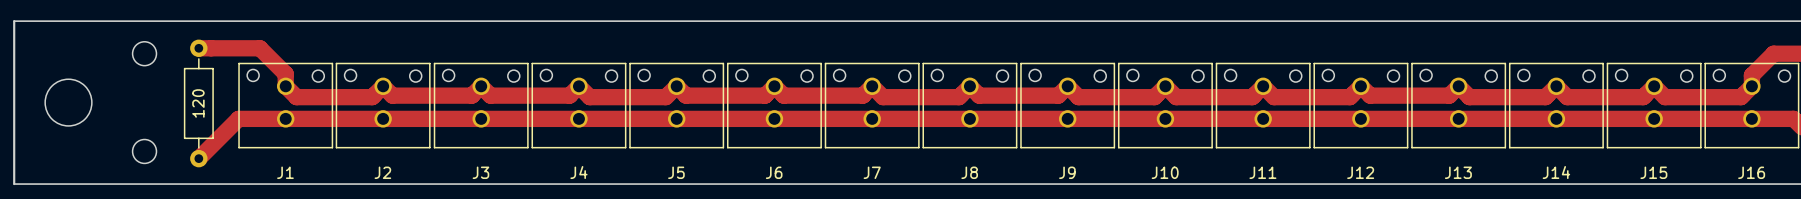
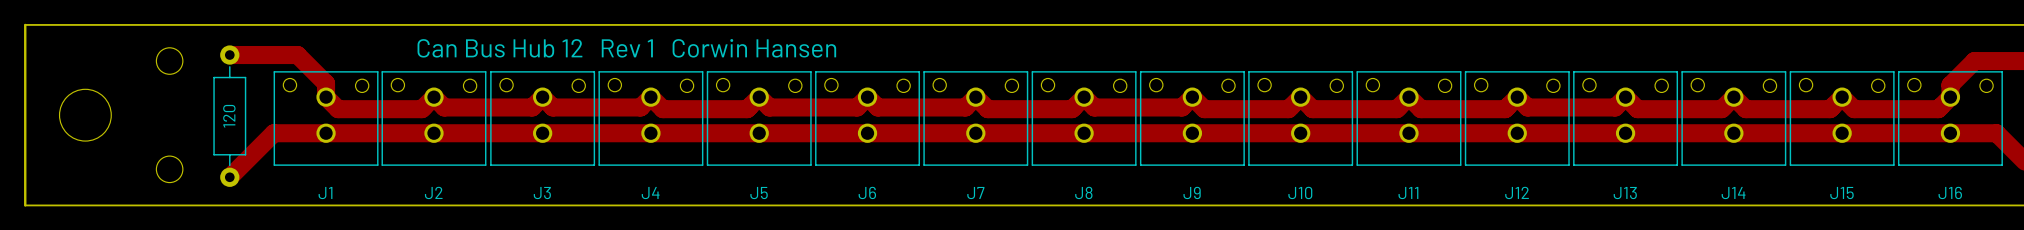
text: none -> Can Bus Hub 12 Rev 1 Corwin Hansen (626, 48)

